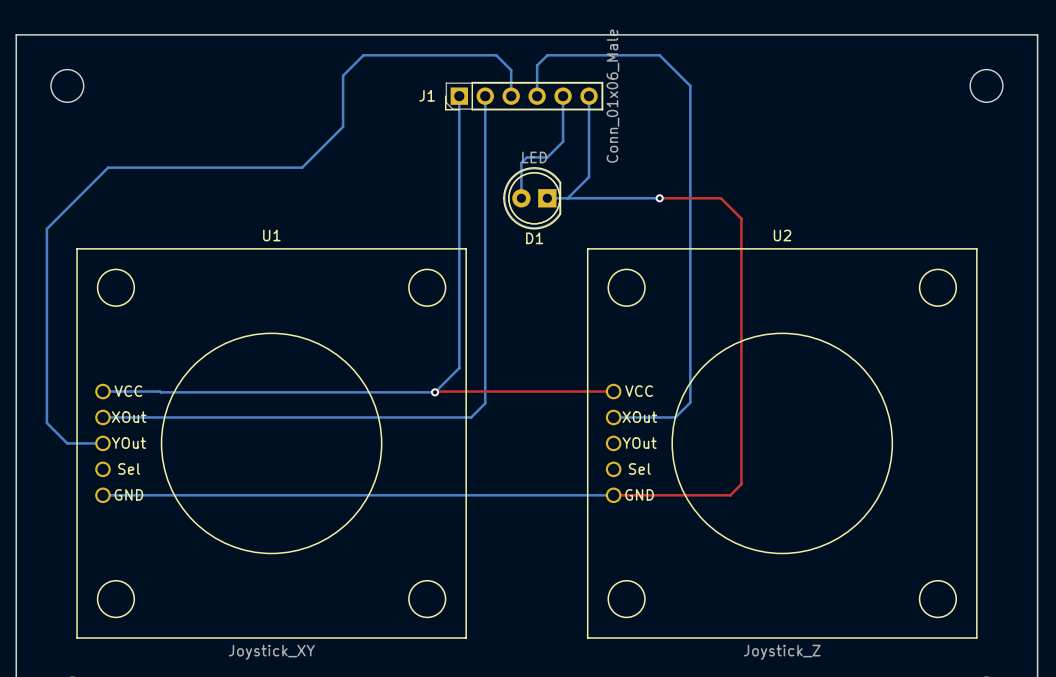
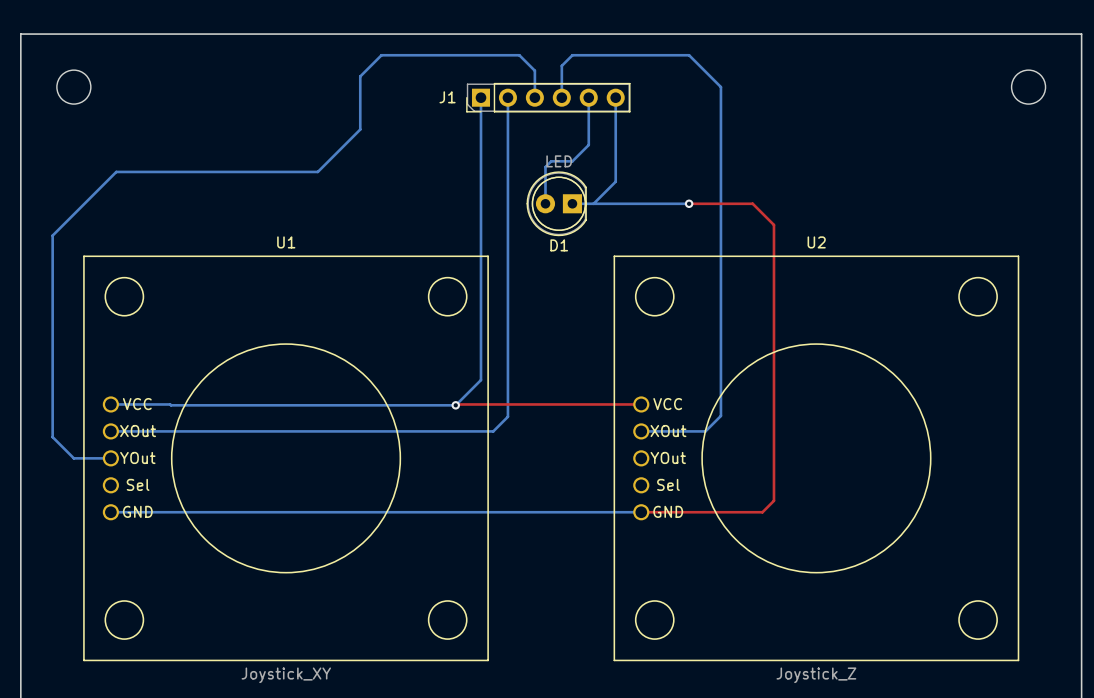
J1 value: Conn_01x06_Male (612, 96) -> none

